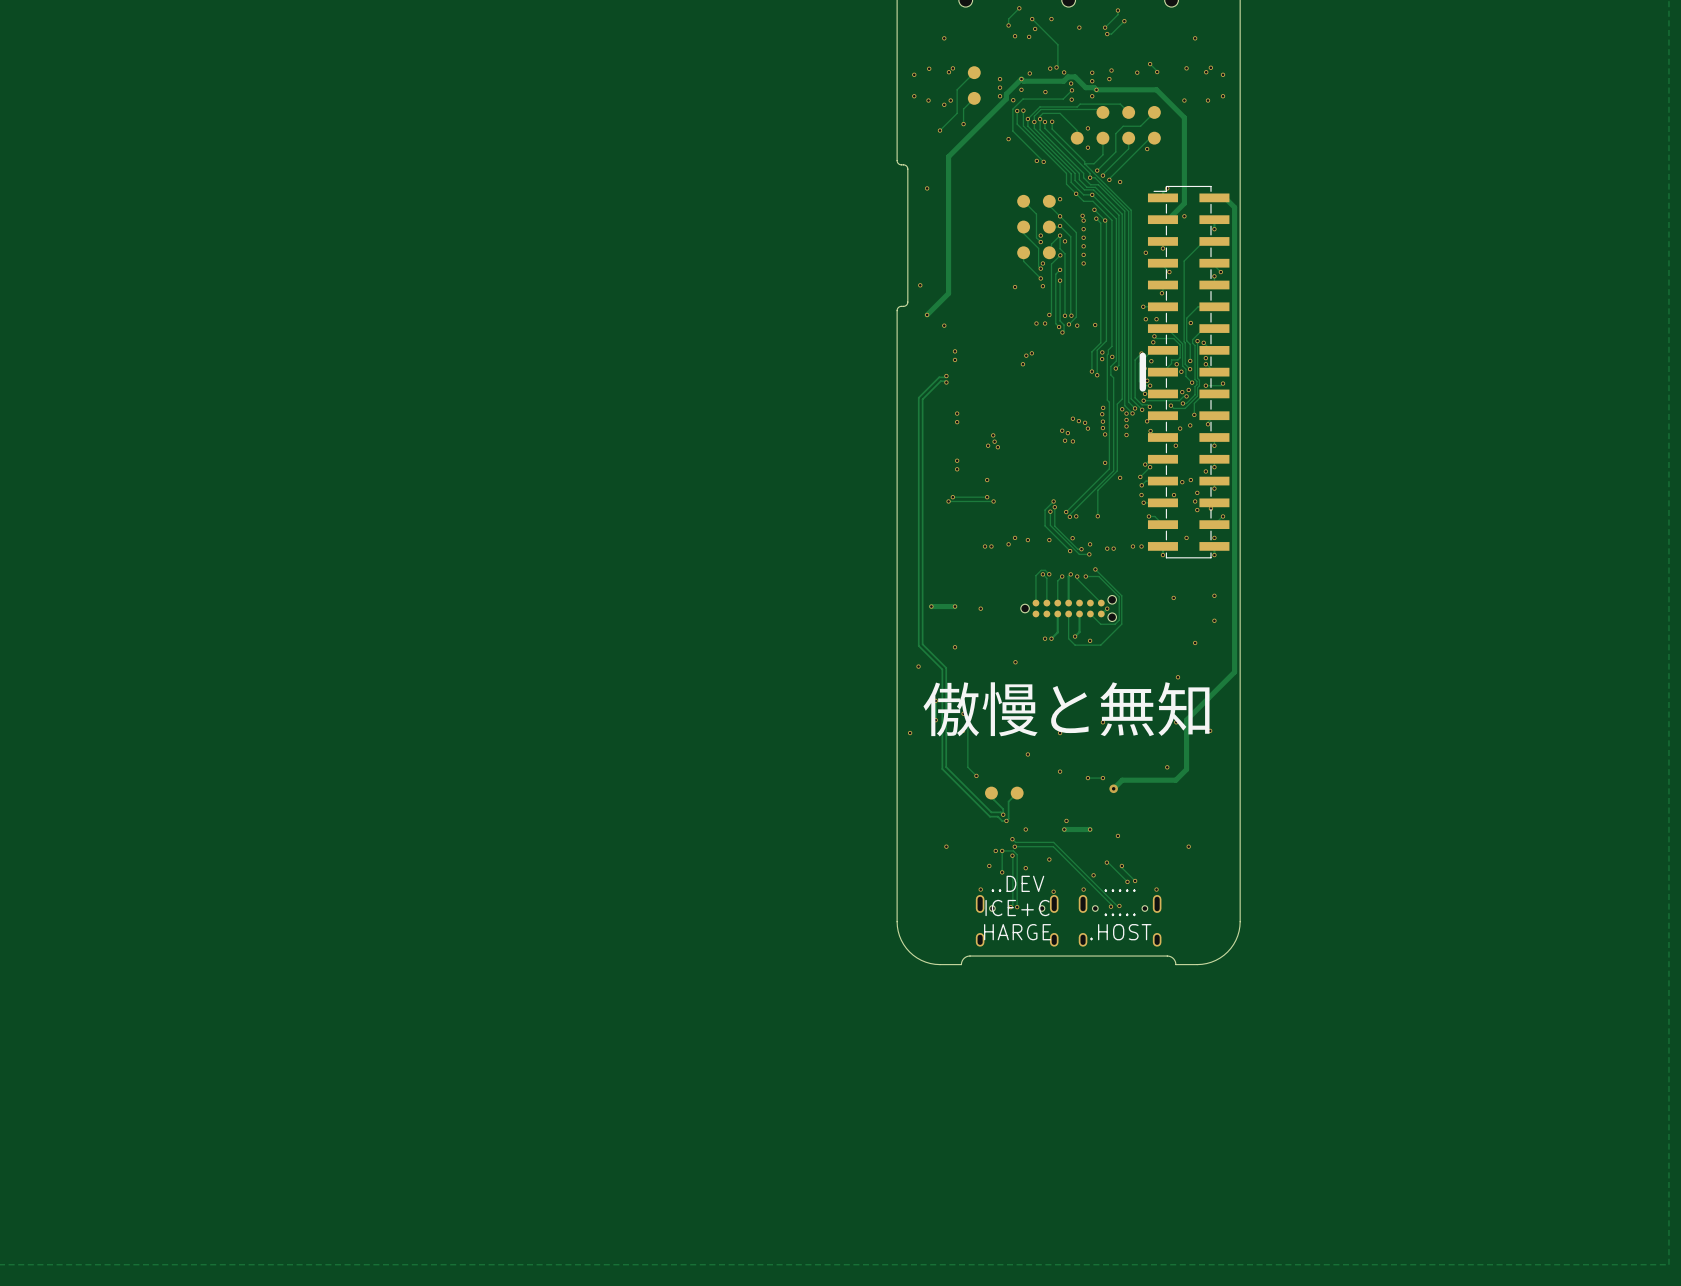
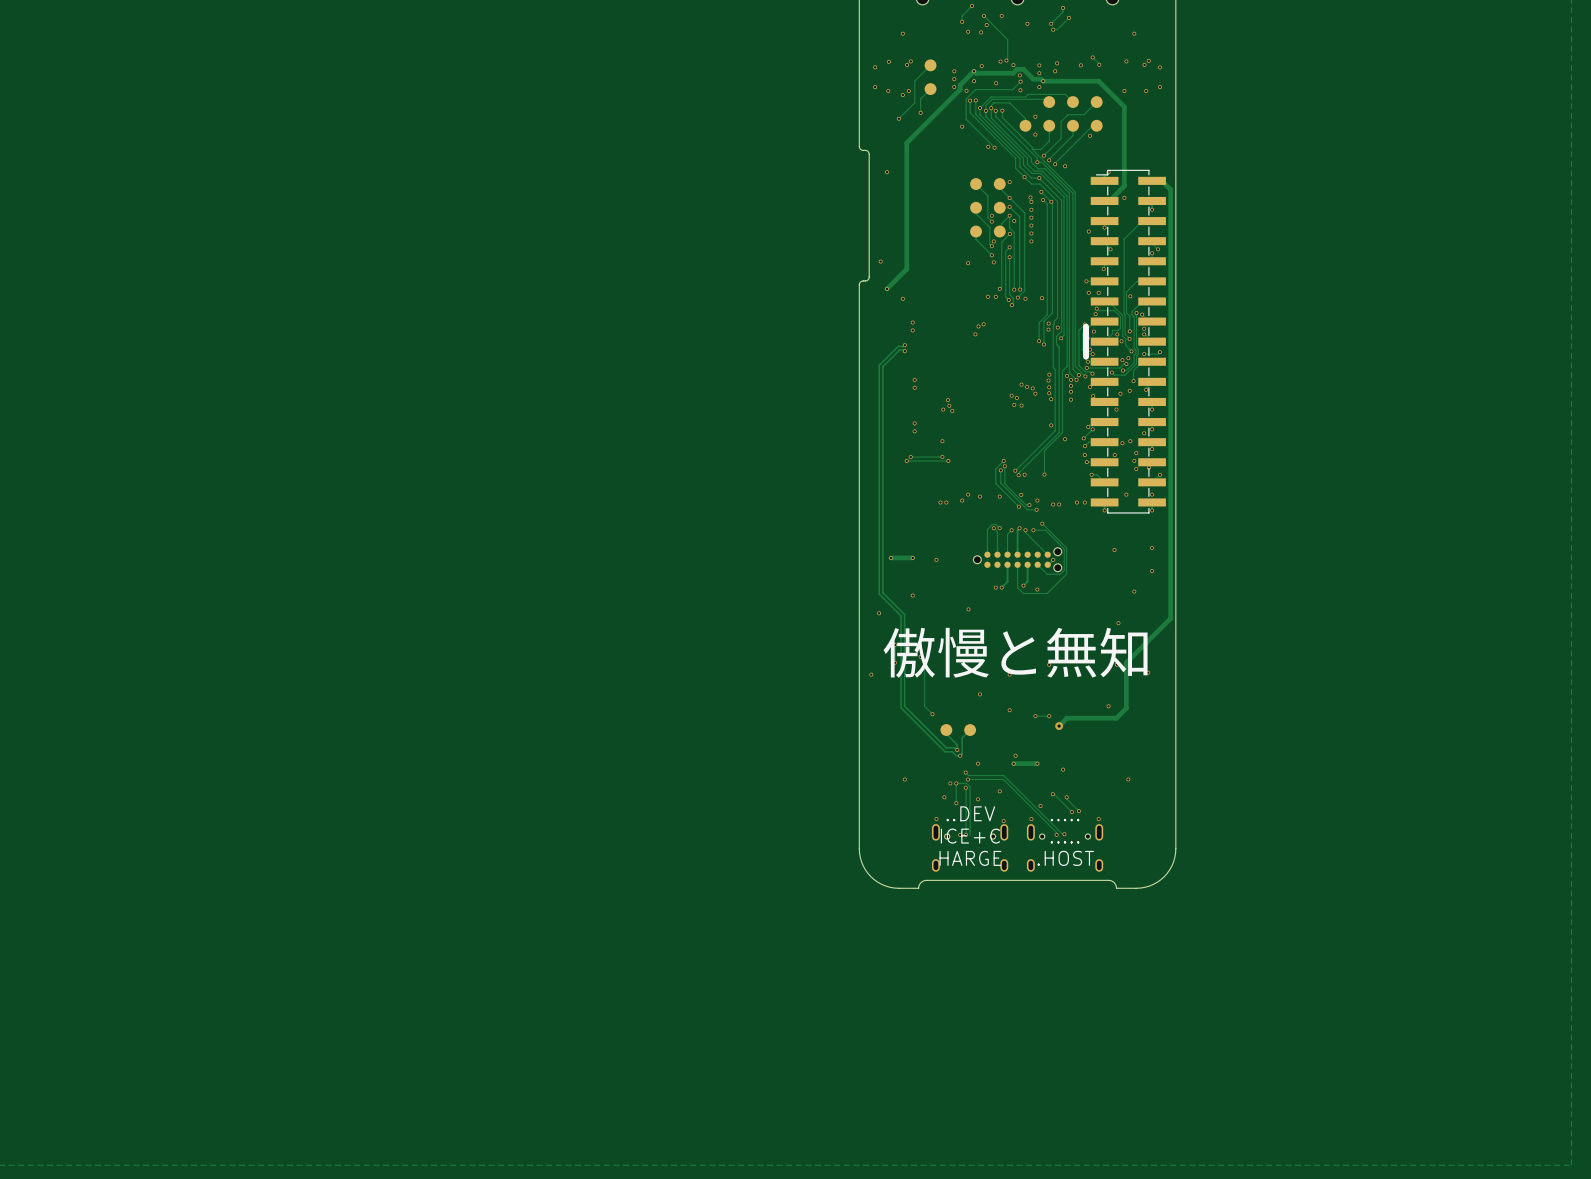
via: none -> (960, 834)
via: none -> (966, 834)
via: (1010, 907) -> none
via: (1017, 907) -> none

